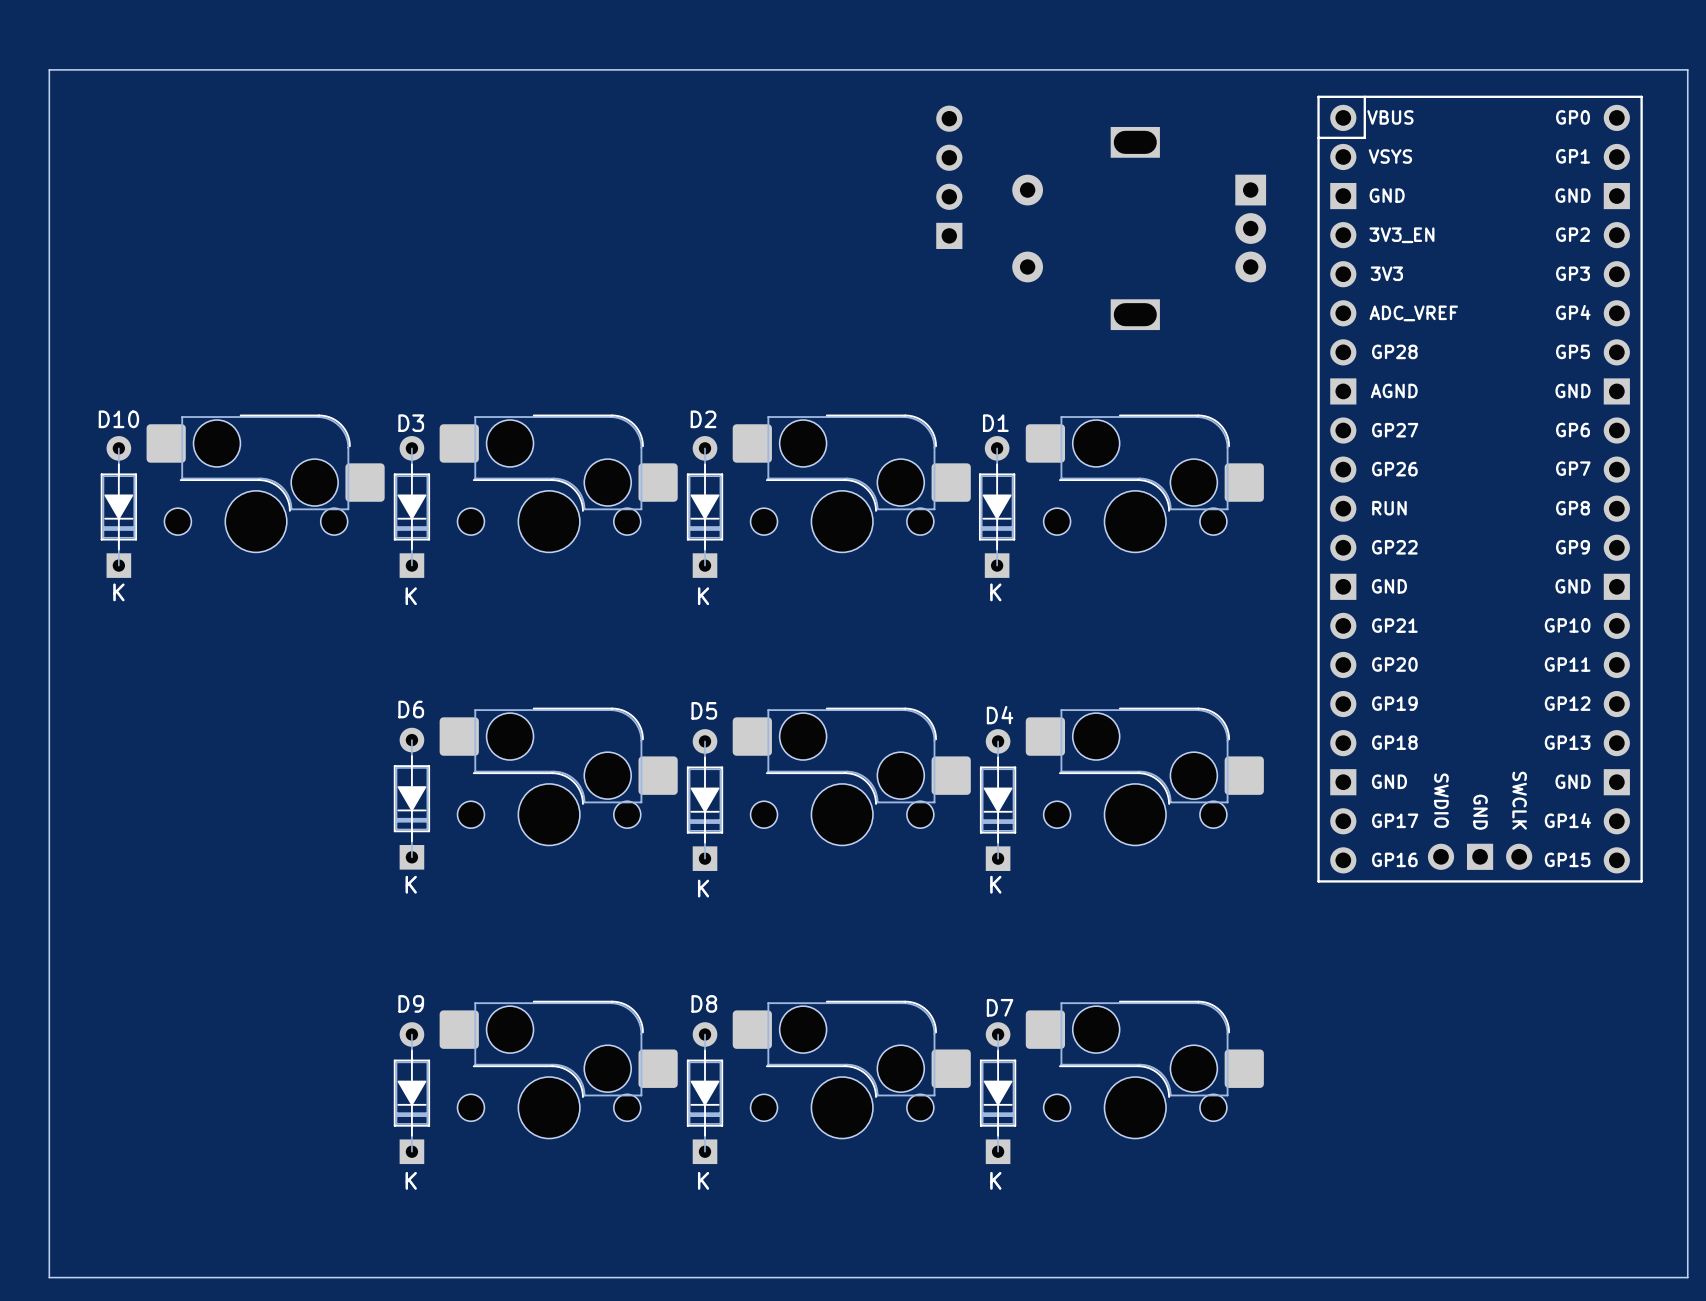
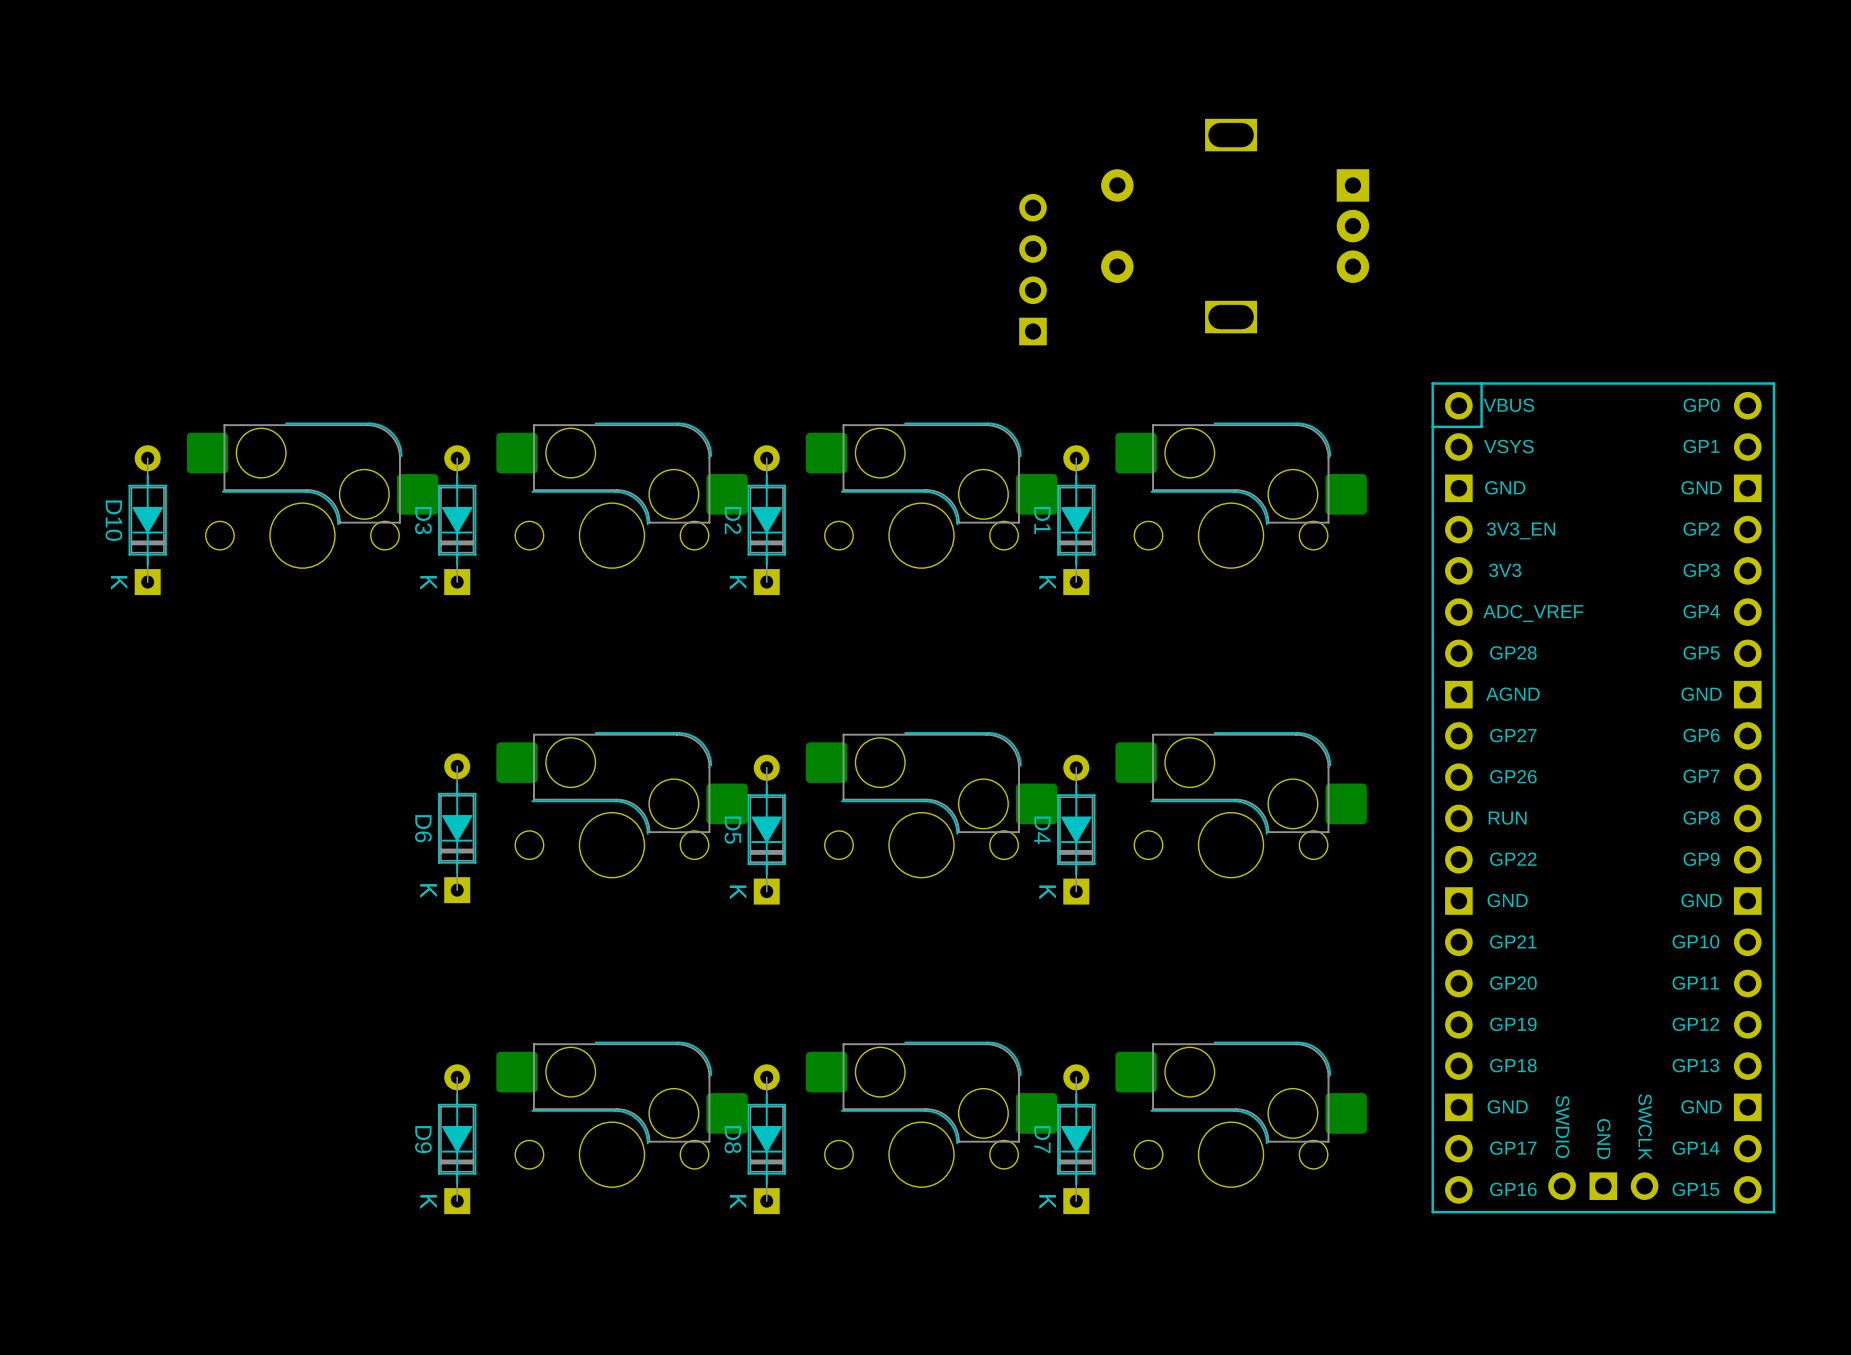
board edge: (1687, 69) (49, 69) (49, 1277) (1687, 1277) (1687, 69) -> none
part position: (949, 177) -> (1033, 269)
D10 name position: D10 (118, 419) -> D10 (113, 520)
D2 name position: D2 (703, 419) -> D2 (733, 520)
D3 name position: D3 (411, 423) -> D3 (423, 520)
D1 name position: D1 (995, 423) -> D1 (1042, 520)
D10 footprint: [100, 436, 138, 578] -> [128, 445, 167, 596]
D3 footprint: [393, 436, 431, 578] -> [438, 445, 477, 596]
D2 footprint: [686, 436, 724, 578] -> [747, 445, 786, 596]
D1 footprint: [978, 436, 1016, 578] -> [1057, 445, 1096, 596]
part position: (1480, 489) -> (1603, 797)
D6 name position: D6 (411, 709) -> D6 (423, 828)
D5 name position: D5 (704, 710) -> D5 (732, 830)
D4 name position: D4 (1000, 715) -> D4 (1042, 830)
D6 footprint: [393, 727, 431, 870] -> [438, 753, 477, 904]
D5 footprint: [686, 729, 724, 871] -> [747, 754, 786, 905]
D4 footprint: [979, 729, 1017, 871] -> [1057, 754, 1096, 905]
D9 name position: D9 (411, 1003) -> D9 (423, 1139)
D8 name position: D8 (704, 1003) -> D8 (732, 1139)
D7 name position: D7 (1000, 1007) -> D7 (1042, 1139)
D9 footprint: [393, 1022, 431, 1165] -> [438, 1064, 477, 1215]
D8 footprint: [686, 1022, 724, 1165] -> [747, 1064, 786, 1215]
D7 footprint: [979, 1022, 1017, 1165] -> [1057, 1064, 1096, 1215]

